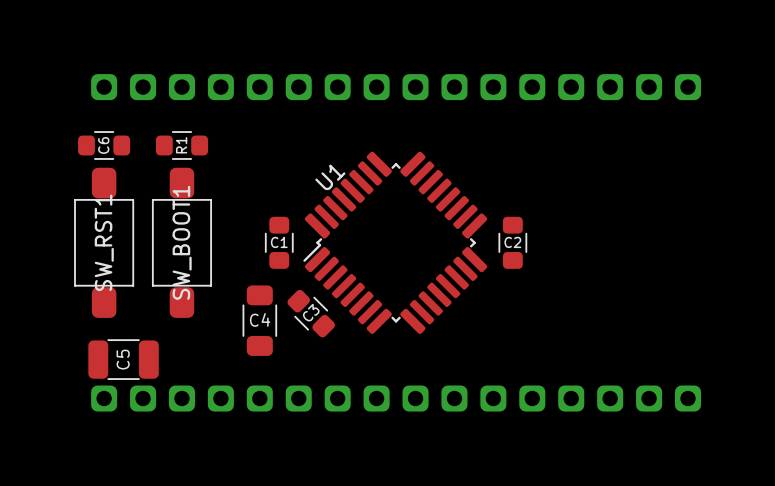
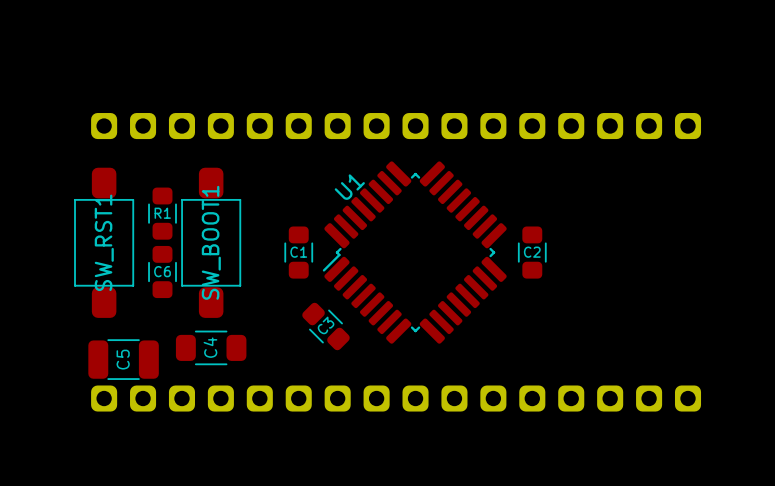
part position: (396, 87) -> (396, 126)
C6 rotation: 0° (104, 145) -> 90° clockwise (162, 272)
C6 position: (104, 145) -> (162, 272)
R1 rotation: 0° (181, 145) -> 90° clockwise (162, 213)
R1 position: (181, 145) -> (162, 213)
SW_BOOT1 position: (181, 242) -> (211, 242)
C1 position: (279, 242) -> (298, 252)
U1 position: (395, 242) -> (414, 252)
C2 position: (512, 242) -> (532, 252)
C3 position: (311, 313) -> (325, 326)
C4 rotation: 0° (259, 320) -> 90° clockwise (211, 347)
C4 position: (259, 320) -> (211, 347)

